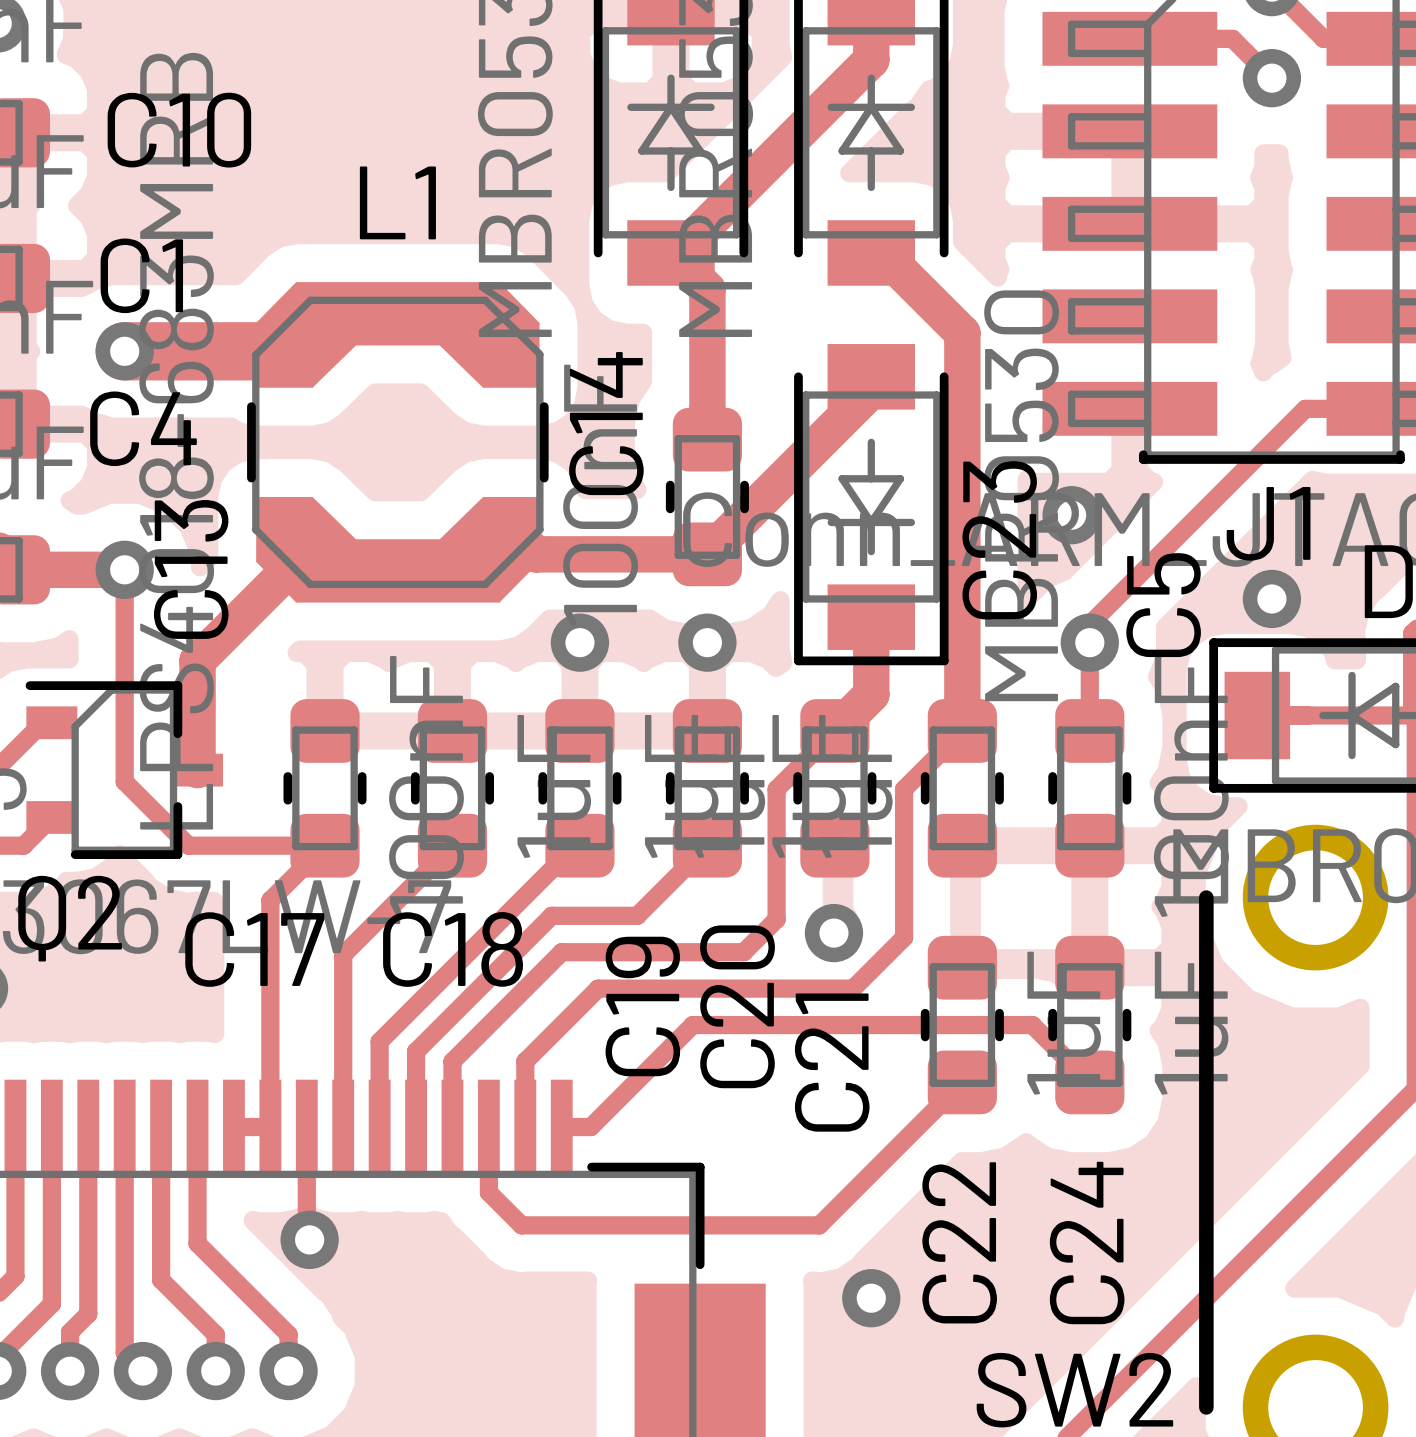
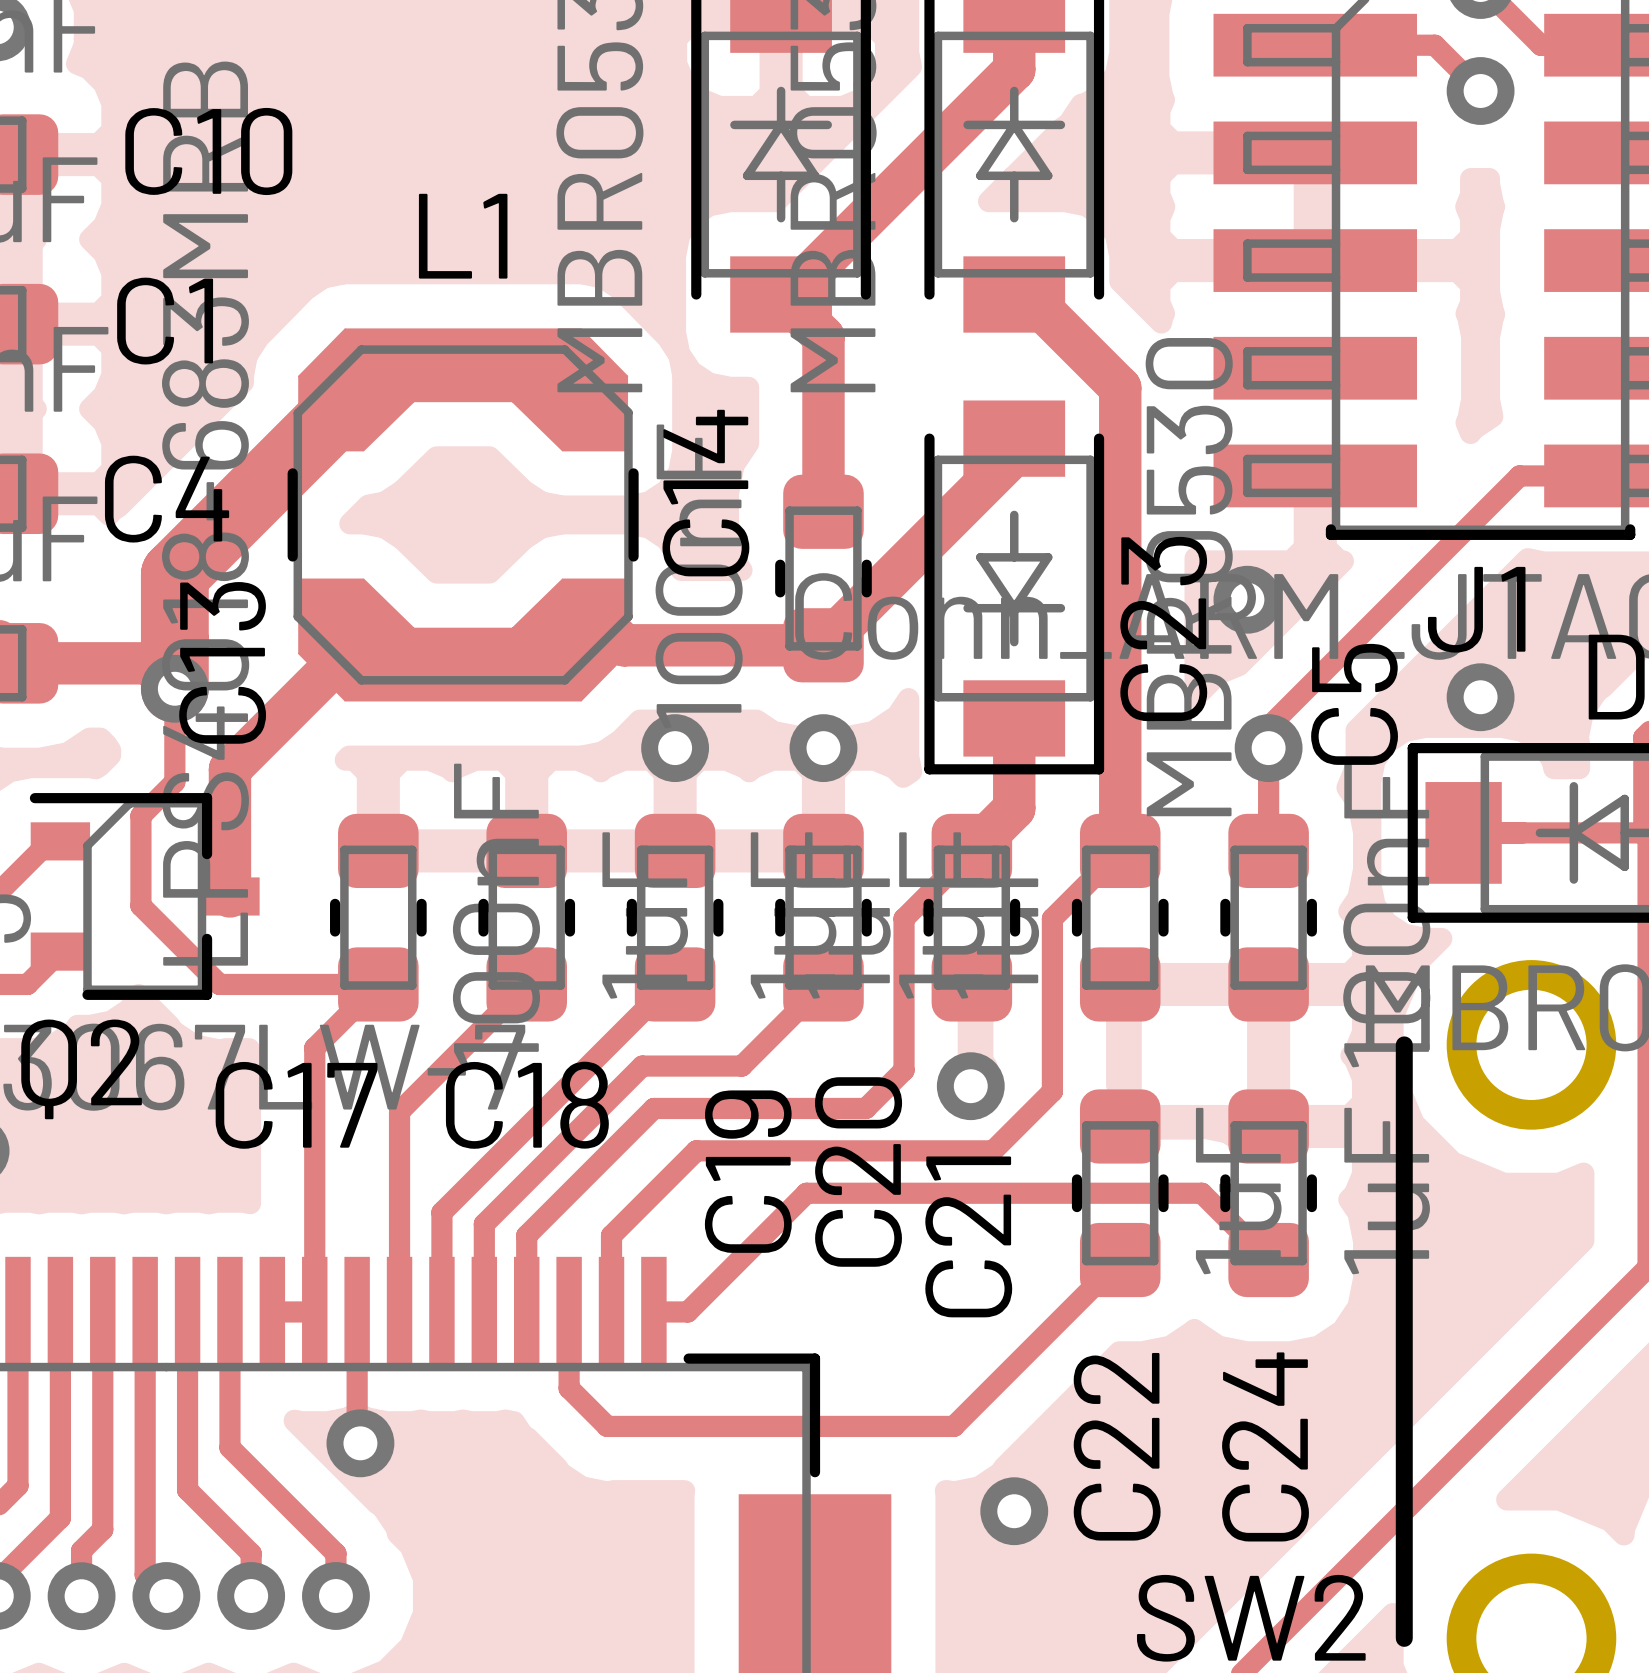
track: (124, 351) (280, 351) (284, 355) -> (174, 688) (174, 574) (331, 418) (331, 413)
via: (124, 351) -> none
track: (124, 569) (124, 781) -> (174, 688) (174, 782) (140, 815) (140, 905) (145, 910)
via position: (124, 569) -> (174, 688)

